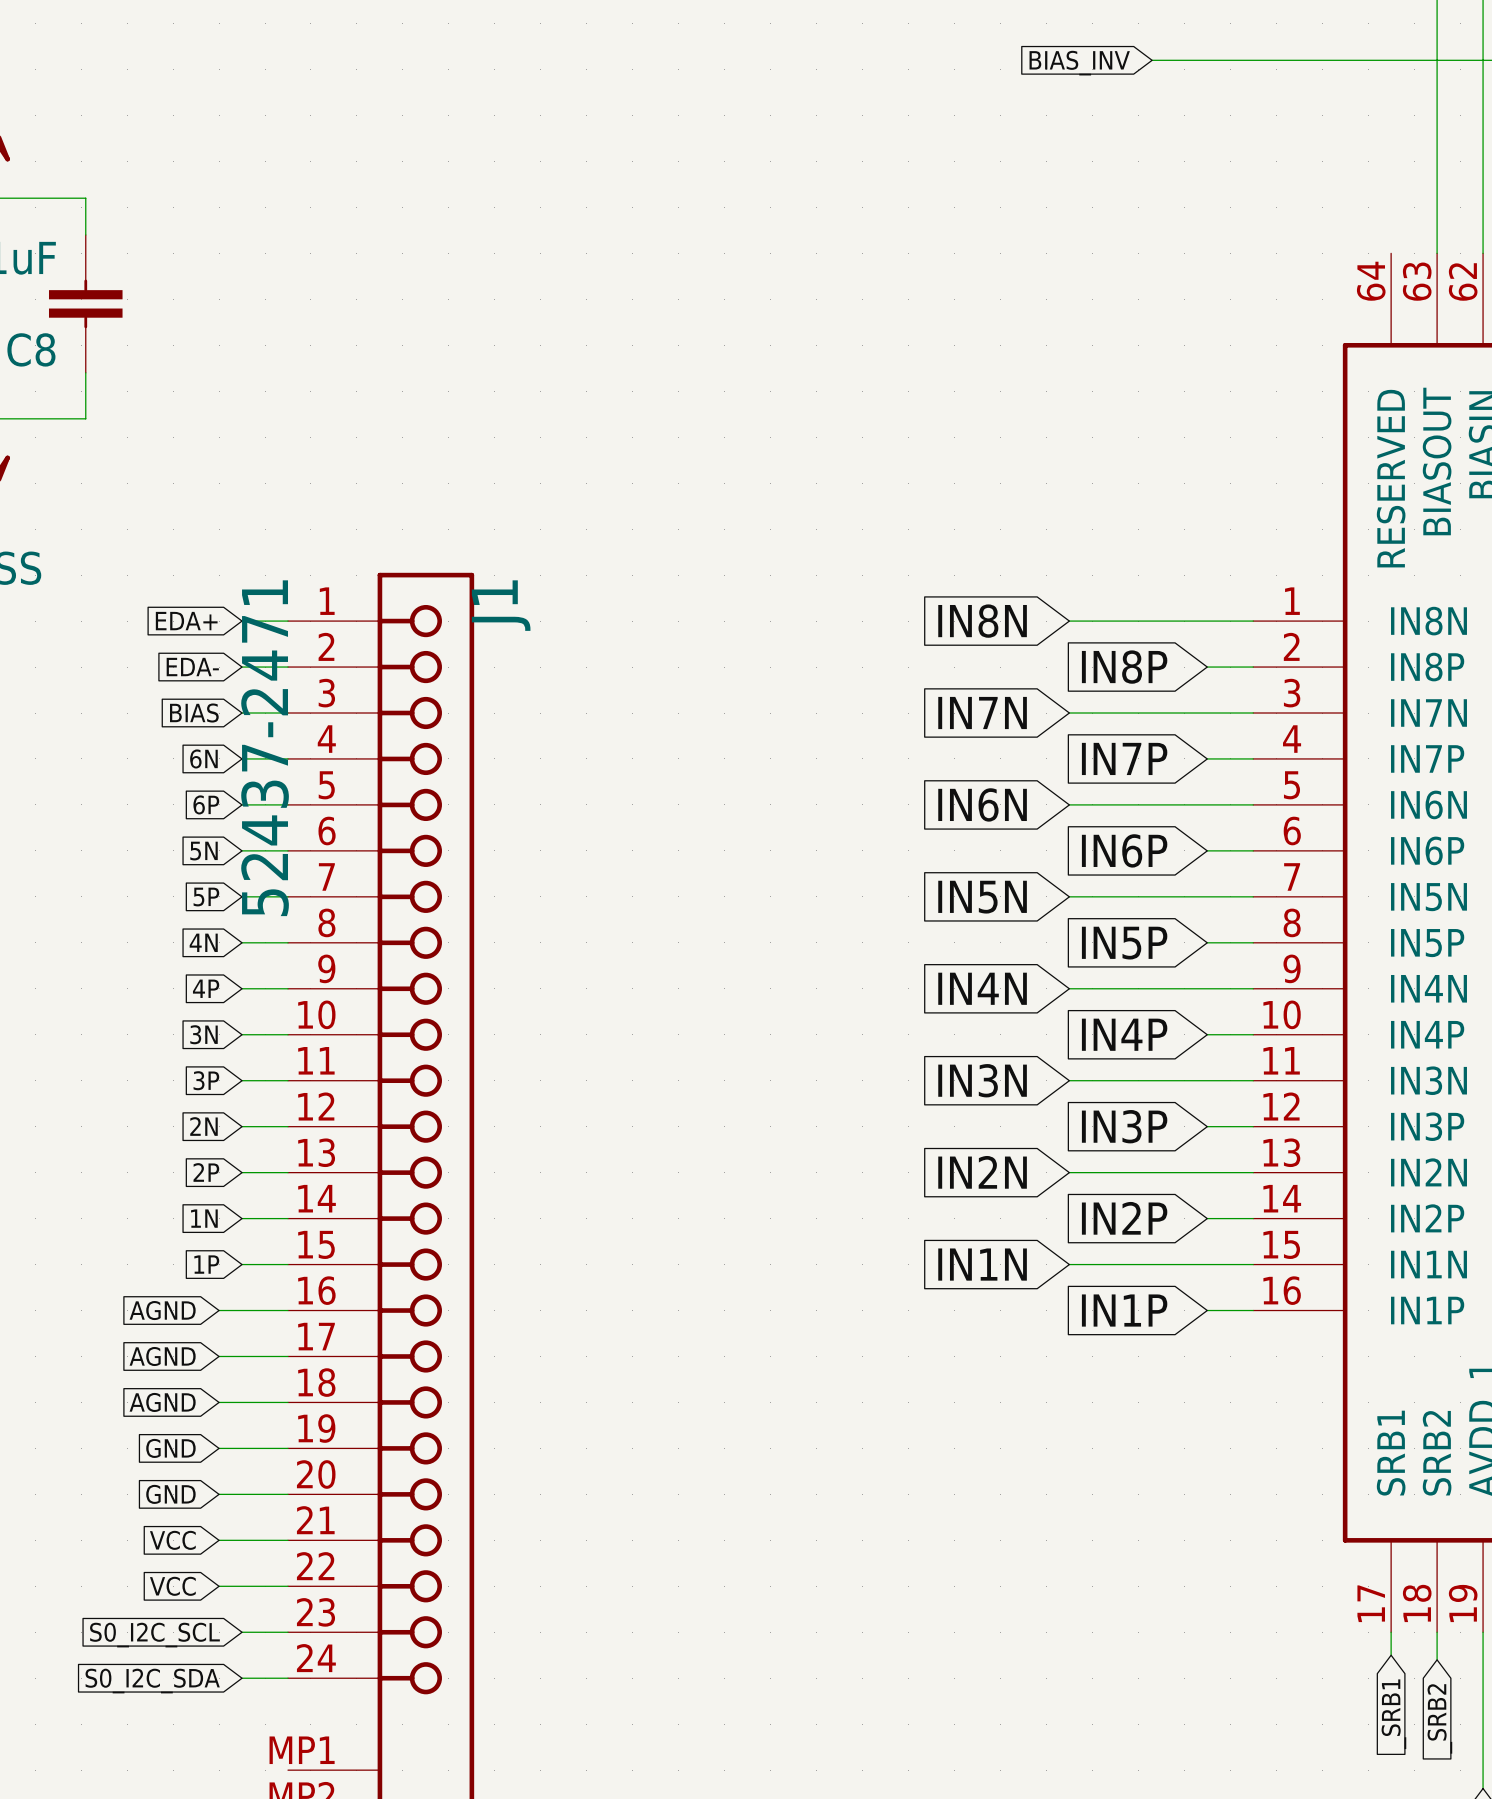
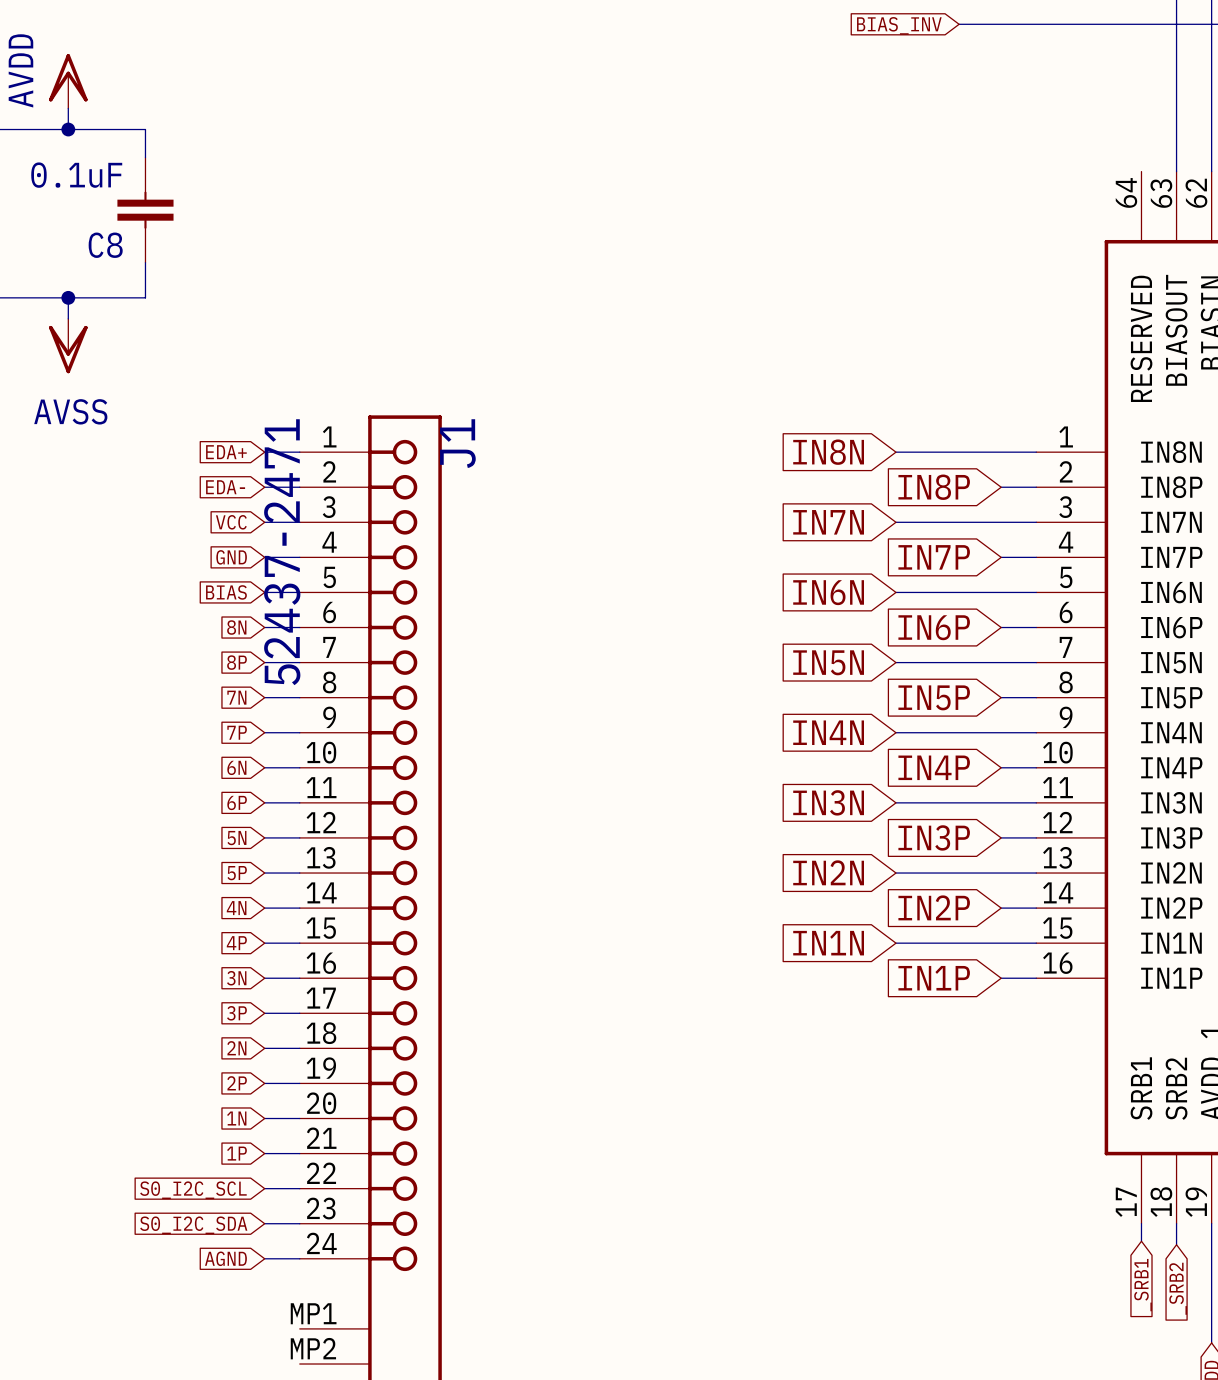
global label: BIAS (194, 713) -> VCC (231, 522)
global label: 6N (203, 758) -> GND (231, 557)
global label: 6P (206, 804) -> BIAS (226, 592)
global label: 5N (204, 851) -> 8N (236, 627)
global label: 5P (206, 897) -> 8P (237, 662)
global label: 4N (203, 942) -> 7N (236, 697)
global label: 4P (206, 988) -> 7P (237, 732)
global label: 3N (204, 1034) -> 6N (236, 767)
global label: 3P (206, 1080) -> 6P (237, 802)
global label: 2N (203, 1126) -> 5N (236, 838)
global label: 2P (206, 1172) -> 5P (237, 873)
global label: 1N (204, 1218) -> 4N (236, 908)
global label: 1P (206, 1264) -> 4P (236, 943)
global label: AGND (162, 1310) -> none
global label: none -> 3N (236, 978)
wire: (219, 1310) (242, 1310) -> none
global label: AGND (162, 1356) -> none
global label: none -> 3P (236, 1013)
wire: (219, 1356) (242, 1356) -> none
global label: AGND (162, 1402) -> none
global label: none -> 2N (236, 1048)
wire: (219, 1402) (242, 1402) -> none
global label: GND (170, 1448) -> none
global label: none -> 2P (237, 1083)
wire: (219, 1448) (242, 1448) -> none
global label: GND (170, 1494) -> none
global label: none -> 1N (236, 1118)
wire: (219, 1494) (242, 1494) -> none
global label: VCC (172, 1540) -> none
global label: none -> 1P (236, 1153)
wire: (219, 1540) (242, 1540) -> none
global label: VCC (172, 1586) -> none
wire: (219, 1586) (242, 1586) -> none
global label: none -> S0_I2C_SCL (193, 1190)
global label: S0_I2C_SCL (154, 1635) -> S0_I2C_SDA (193, 1225)
global label: S0_I2C_SDA (152, 1681) -> AGND (225, 1258)

